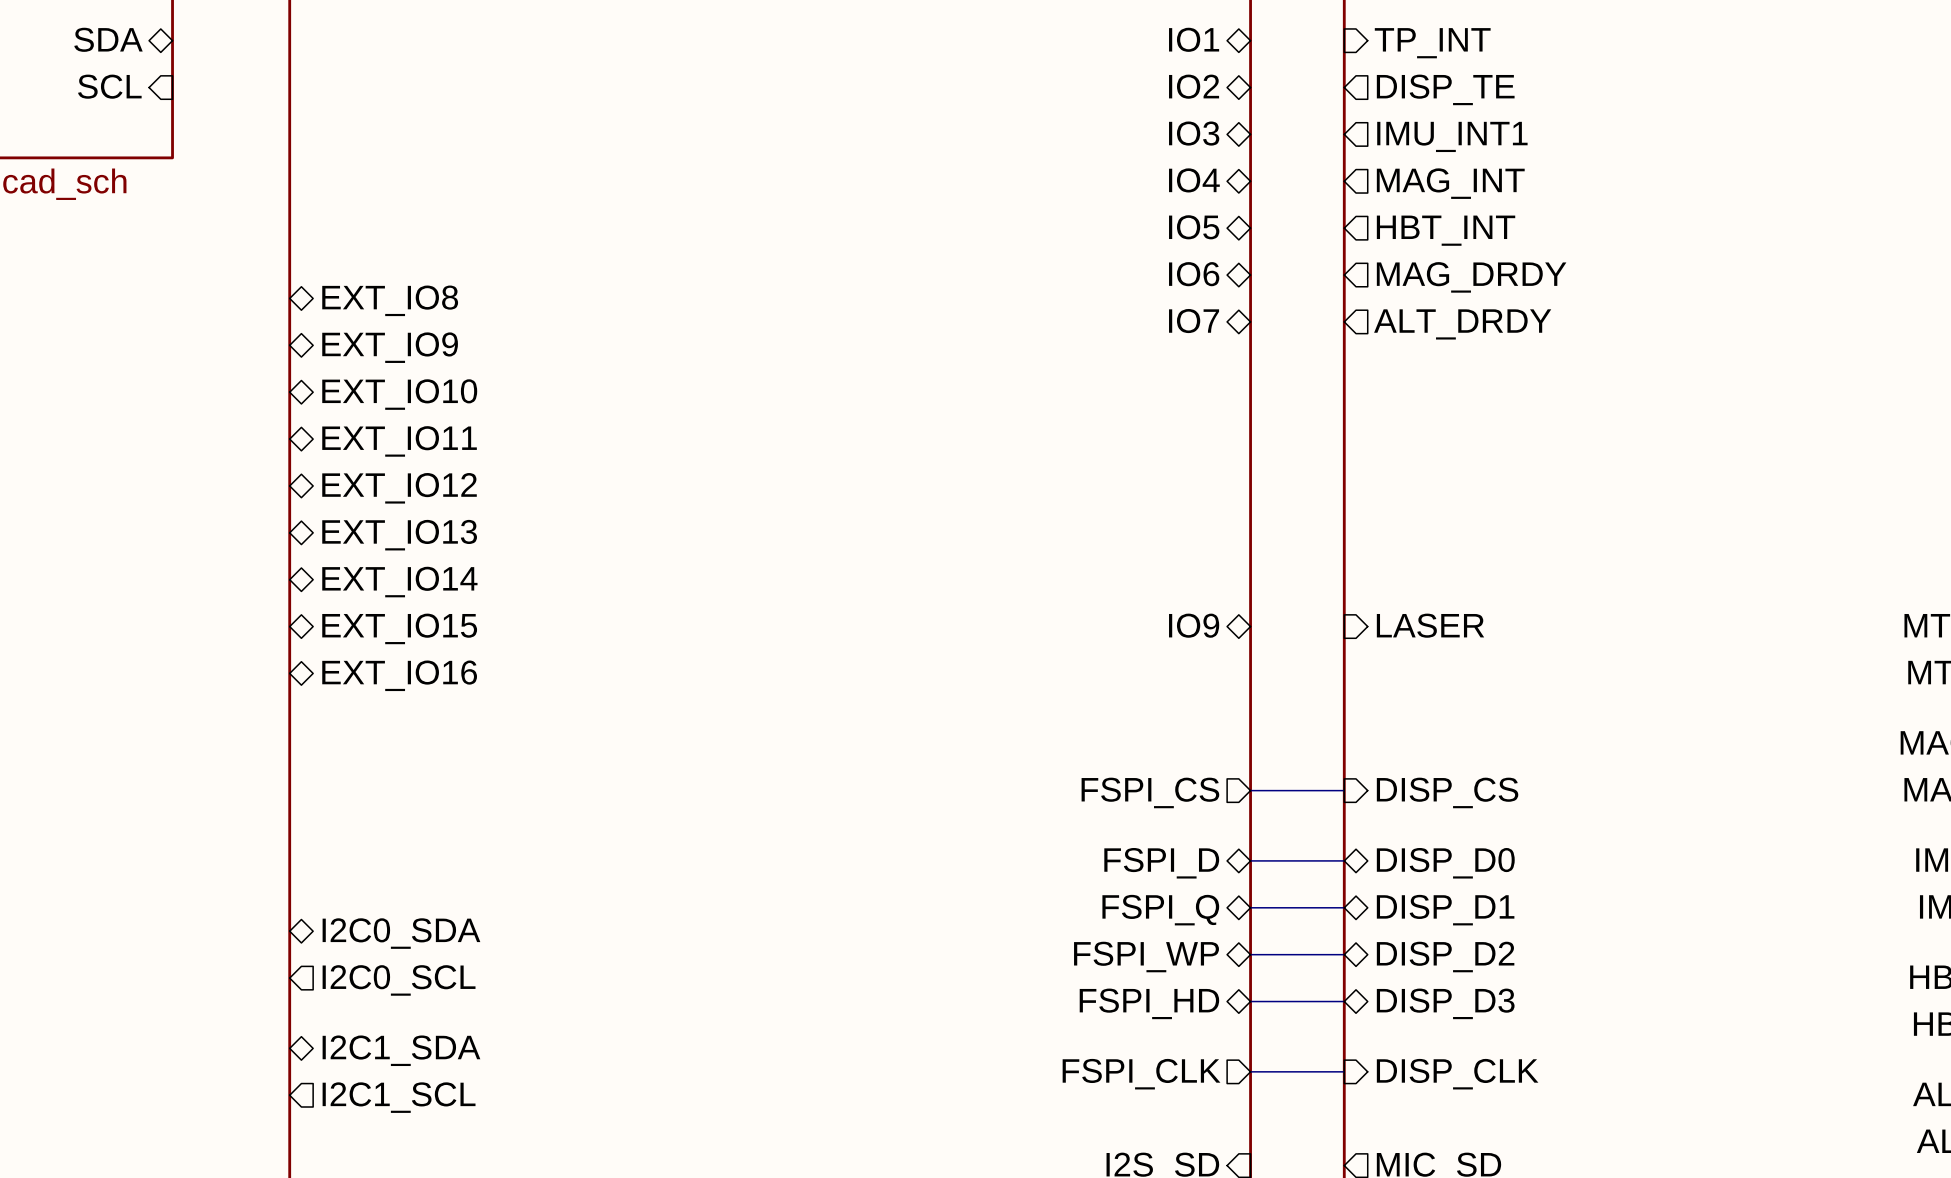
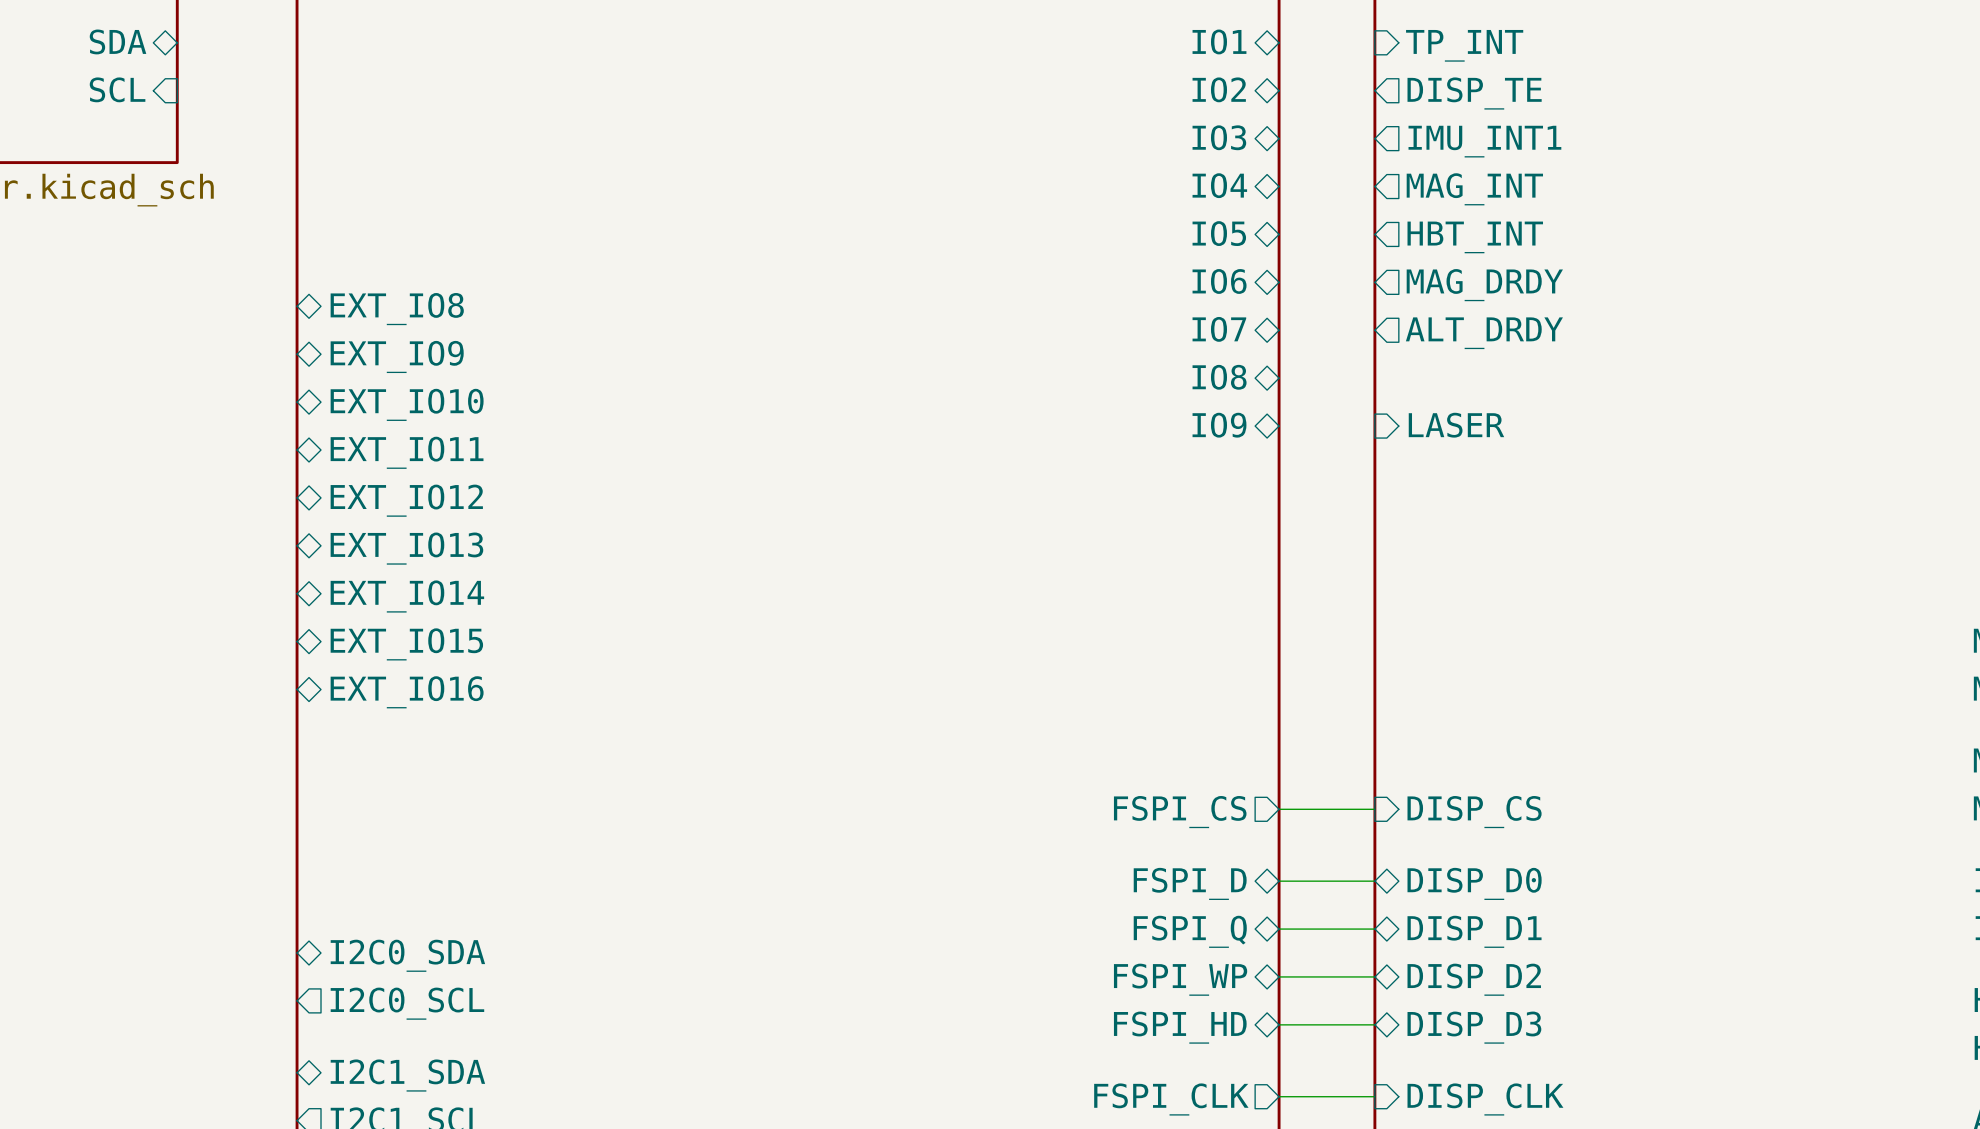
sheet pin: none -> IO8 (1219, 377)
sheet pin position: IO9 (1194, 625) -> IO9 (1219, 425)
sheet pin position: LASER (1430, 625) -> LASER (1456, 425)

